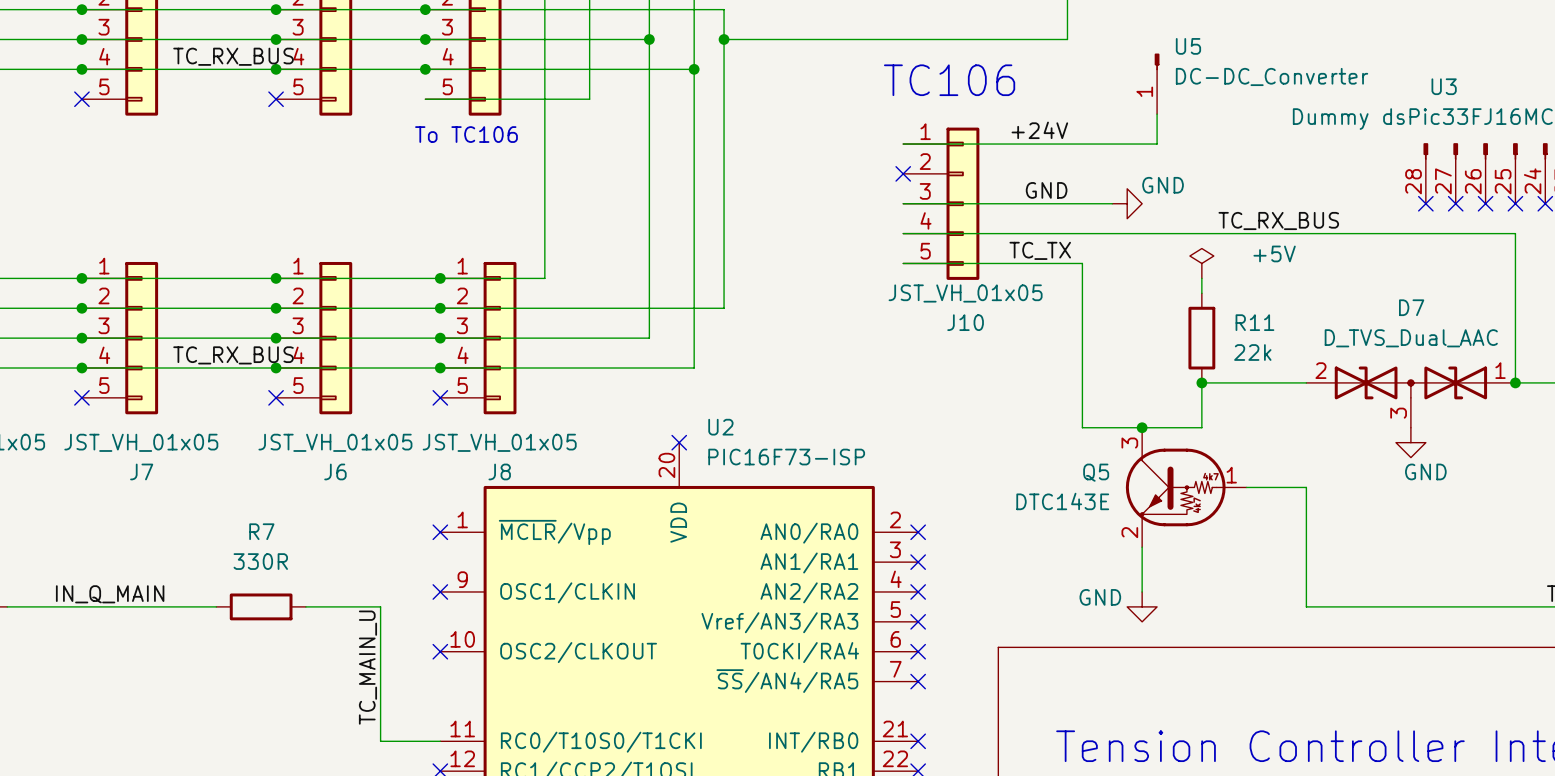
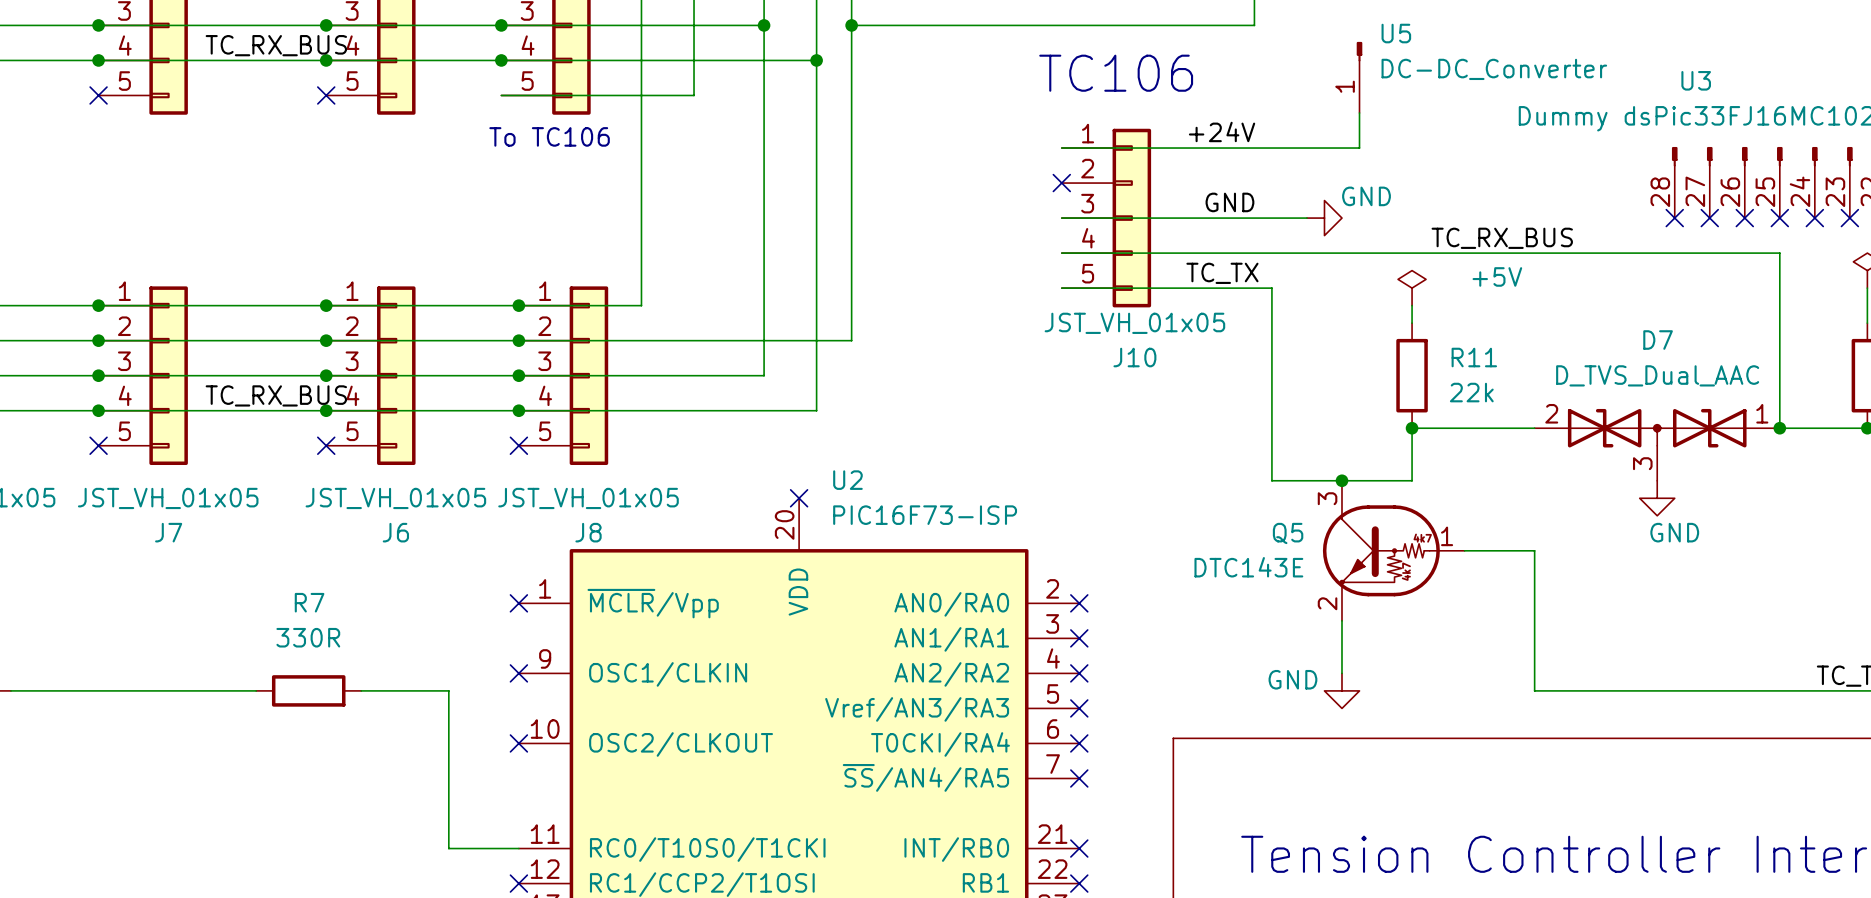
label: IN_Q_MAIN (110, 594) -> none
label: TC_MAIN_U (367, 667) -> none

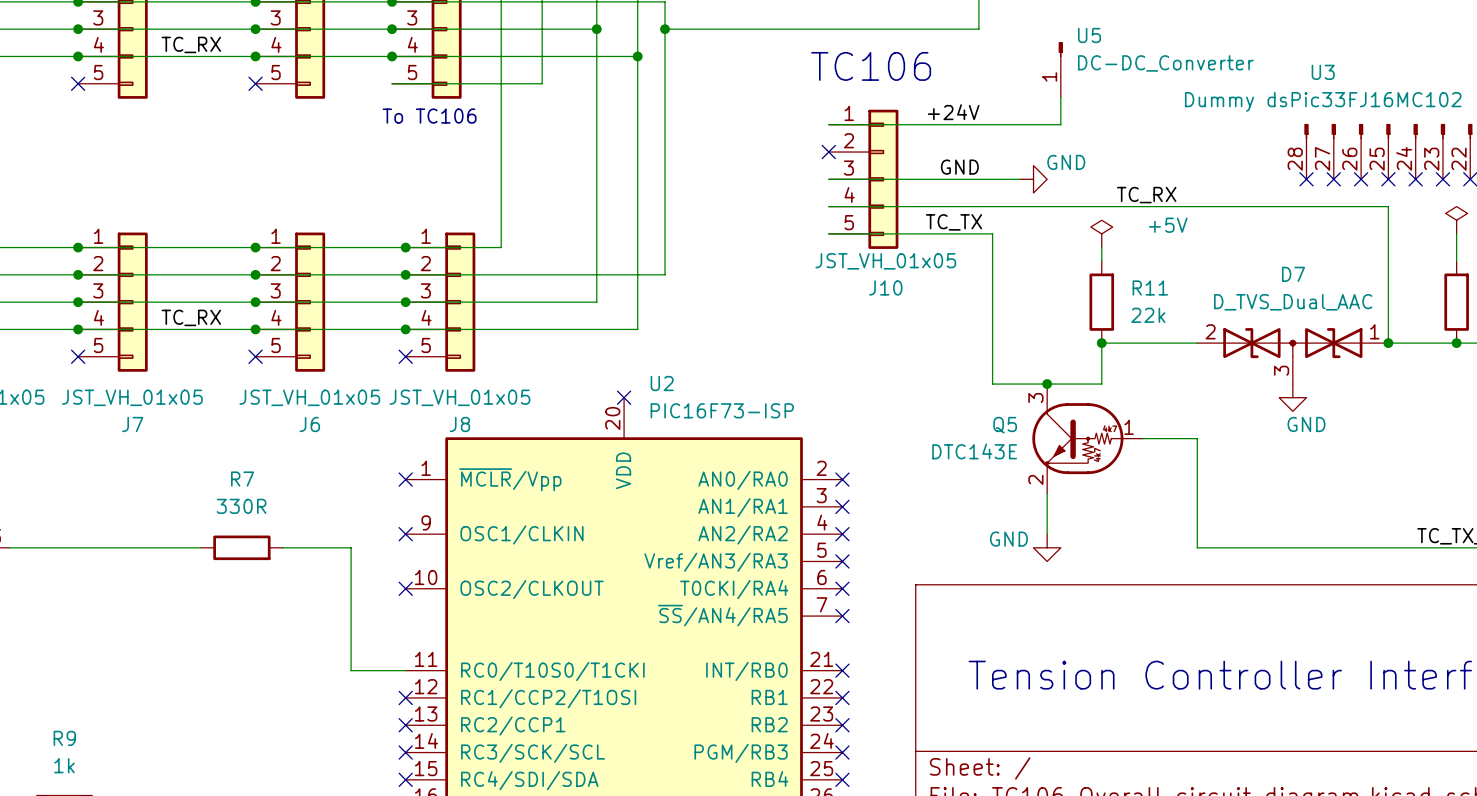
label: TC_RX_BUS (276, 45) -> TC_RX (191, 44)
label: TC_RX_BUS (1502, 238) -> TC_RX (1146, 195)
label: TC_RX_BUS (276, 395) -> TC_RX (191, 317)

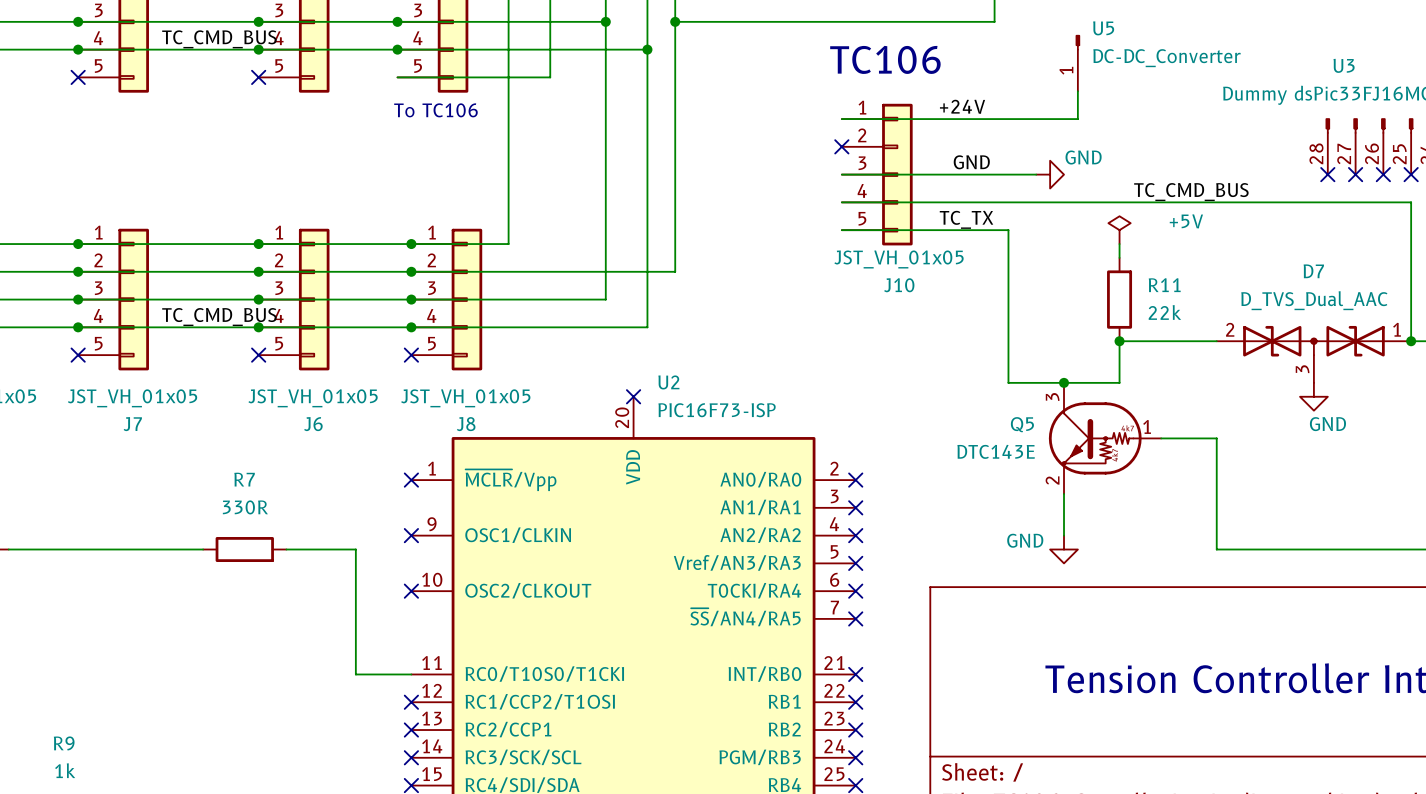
label: TC_RX (191, 44) -> TC_CMD_BUS (219, 39)
label: TC_RX (1146, 195) -> TC_CMD_BUS (1191, 192)
label: TC_RX (191, 317) -> TC_CMD_BUS (219, 317)

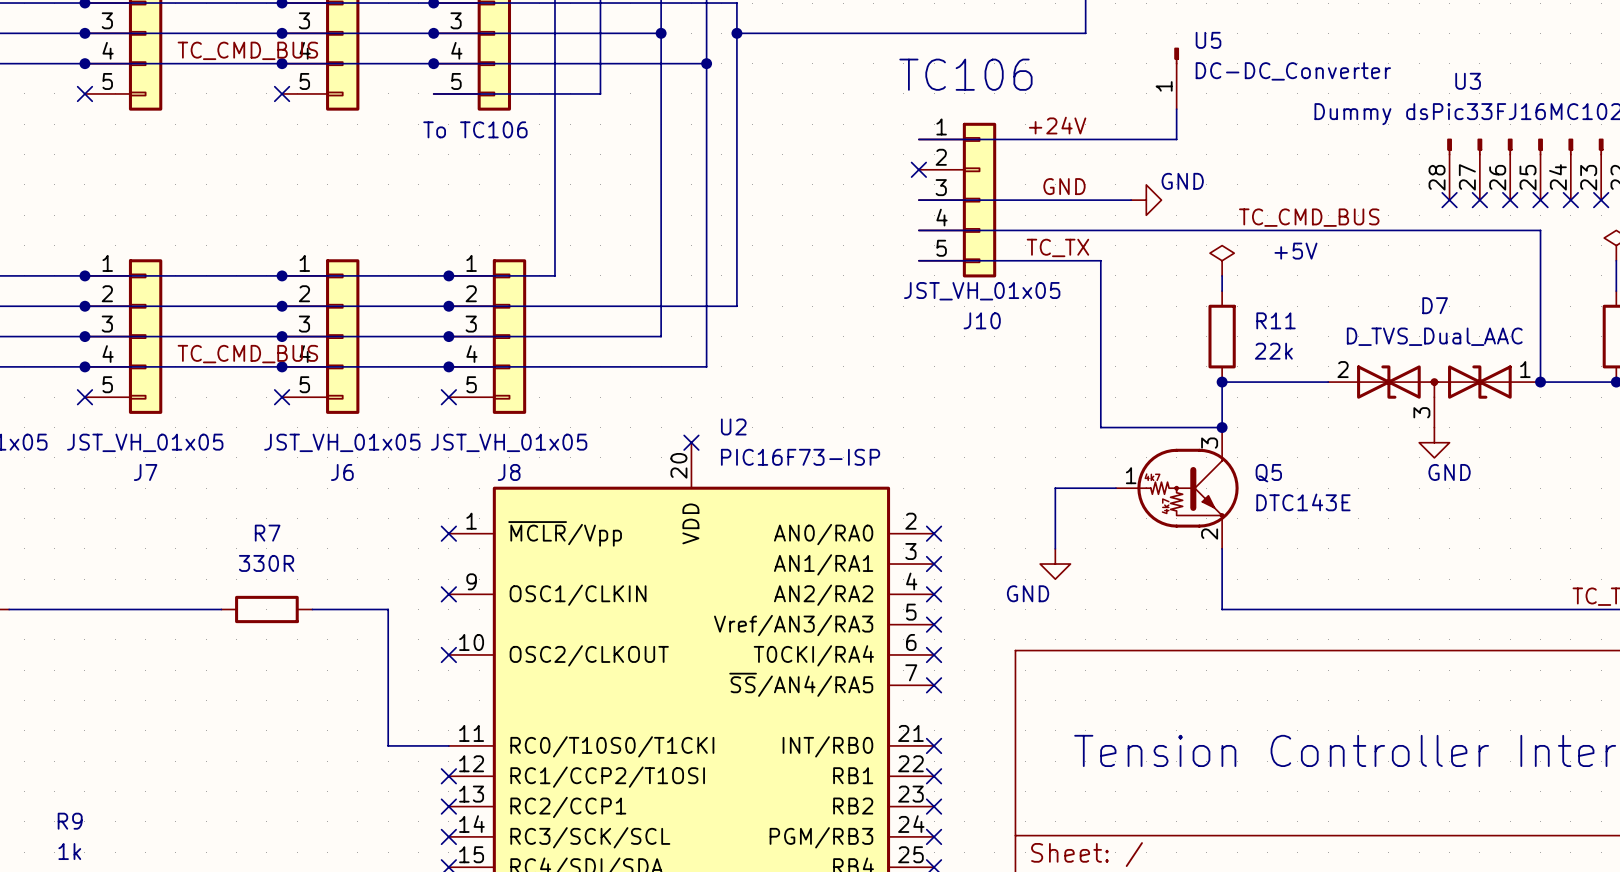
junction position: (1064, 382) -> (1222, 427)
wire: none -> (1115, 488) (1055, 488) (1055, 548)
Q5 flip: as is (1095, 438) -> left-right (1188, 488)
wire: (1161, 438) (1216, 438) (1216, 549) -> (1222, 548) (1222, 609) (1328, 609)
wire: (1064, 493) (1064, 535) -> none
power symbol text position: GND (1025, 540) -> GND (1028, 593)
power symbol position: GND (1064, 549) -> GND (1055, 564)

